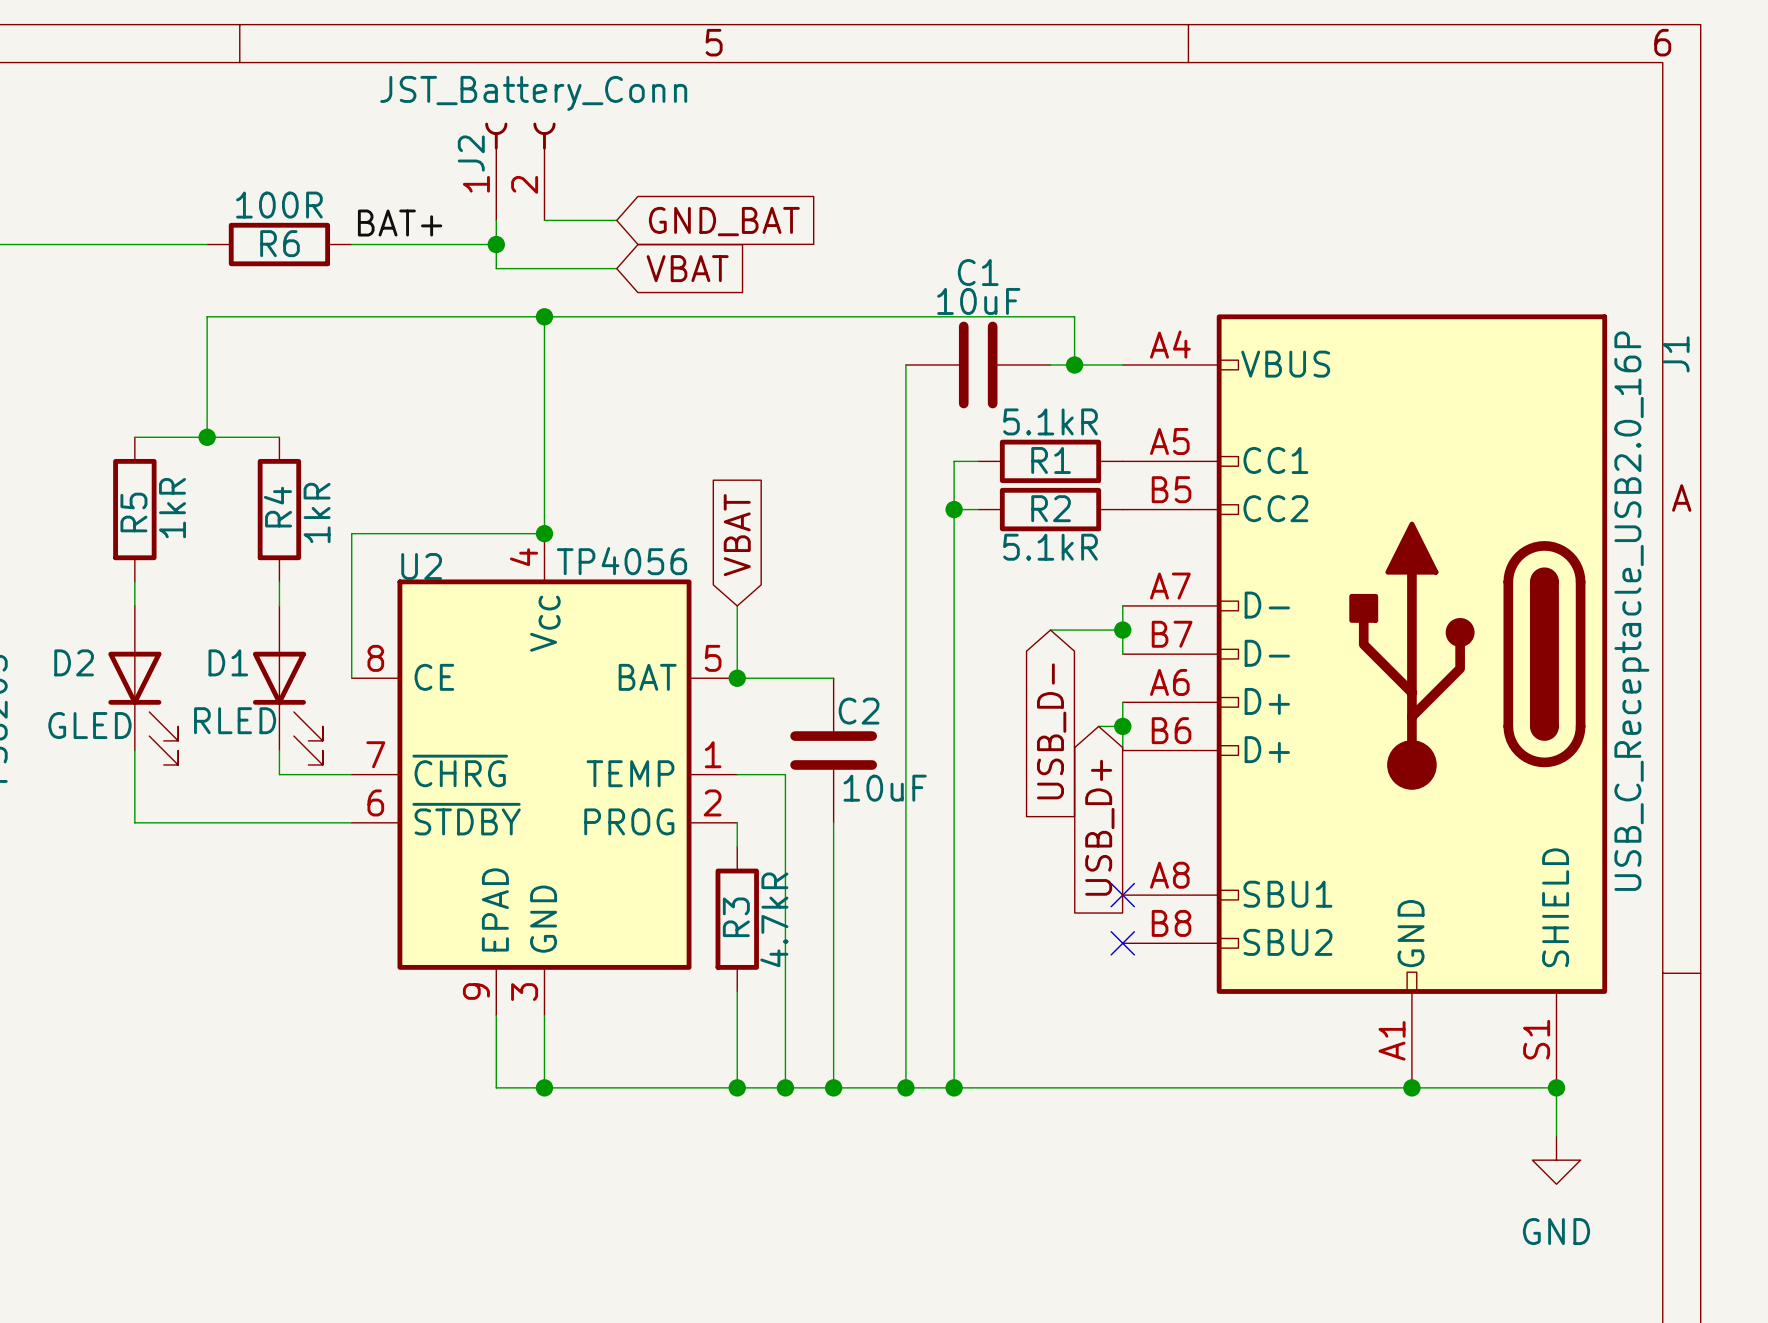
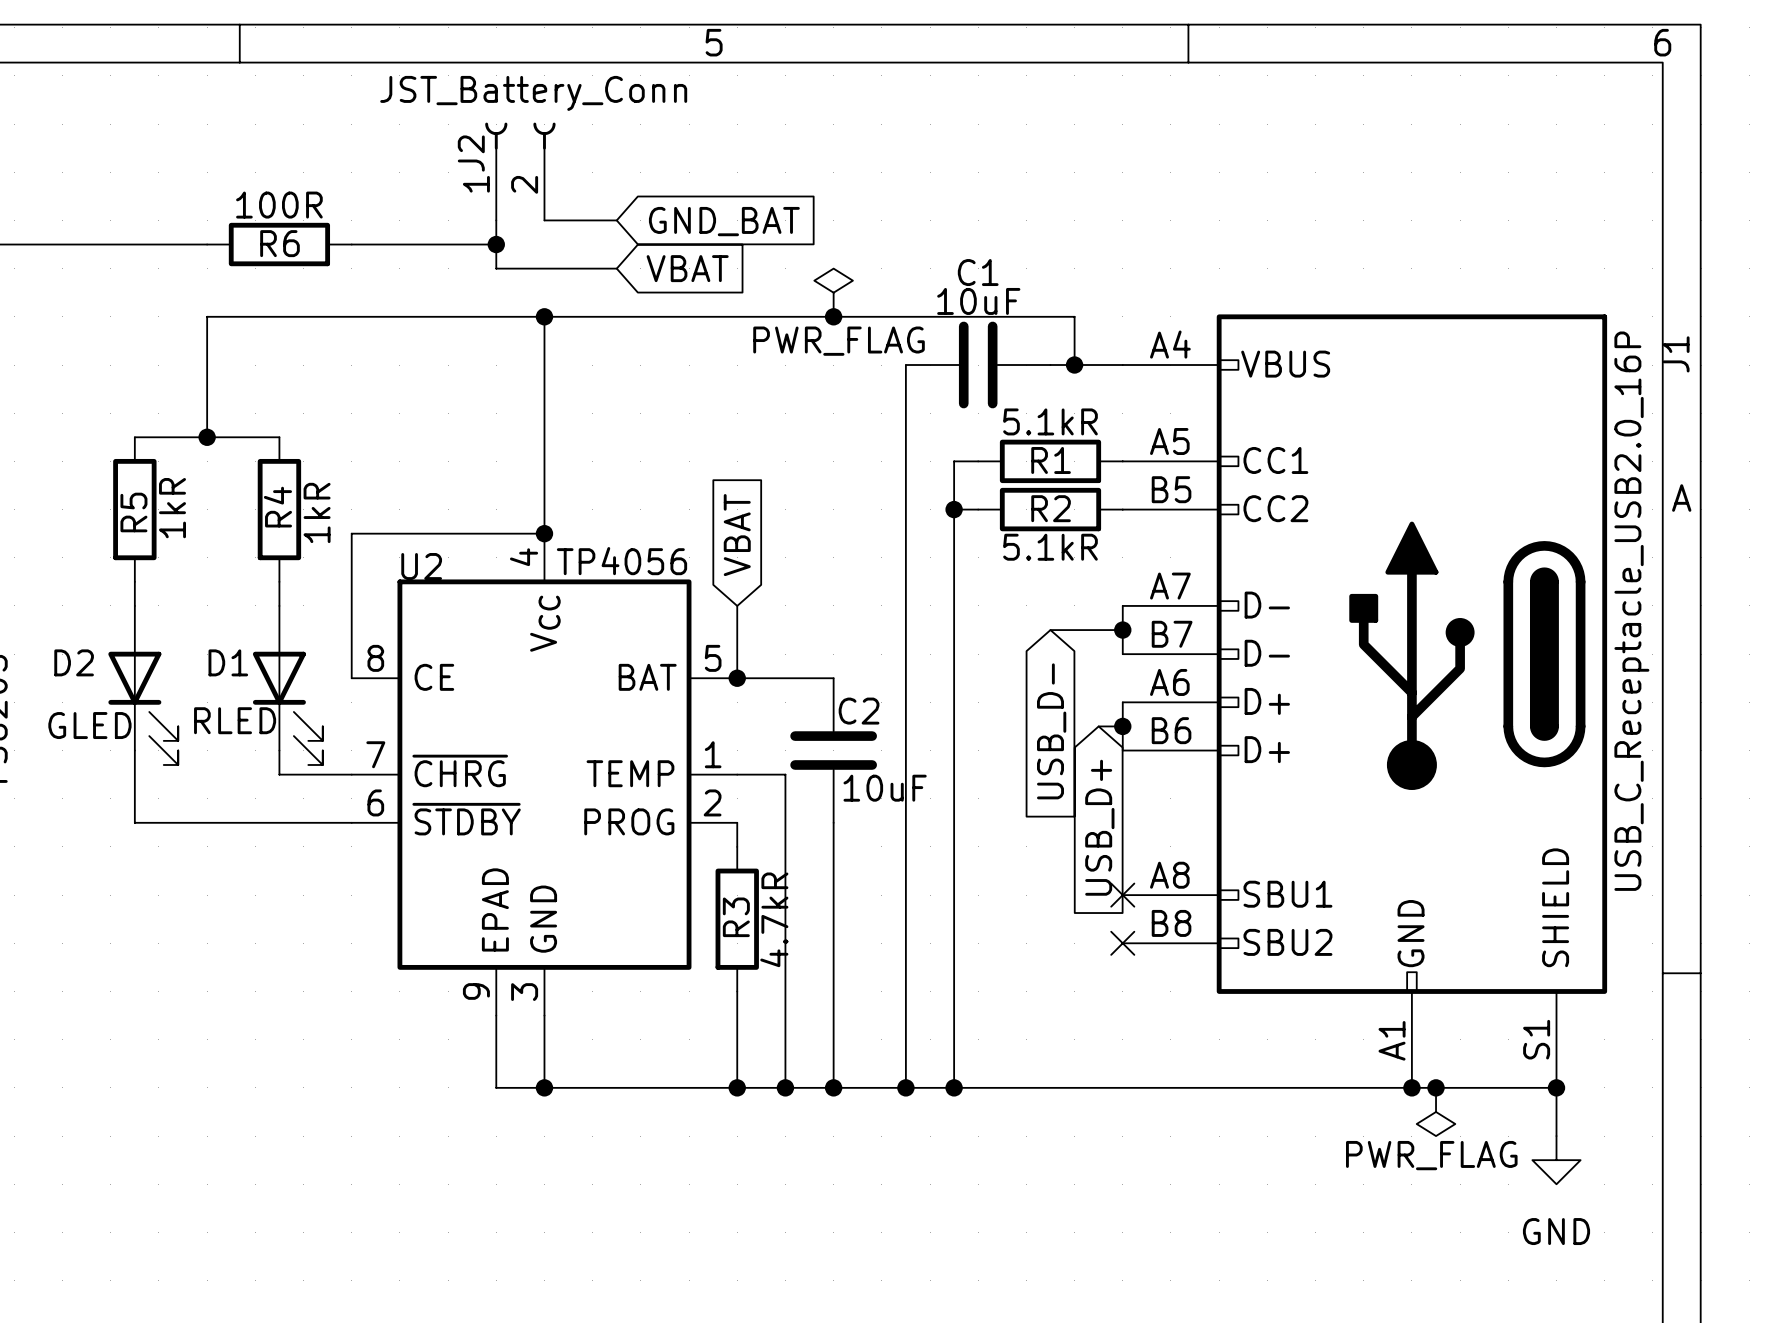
label: BAT+ (400, 223) -> none
power symbol: none -> PWR_FLAG (833, 292)
junction: none -> (833, 316)
junction: none -> (1436, 1087)
power symbol: none -> PWR_FLAG (1436, 1111)

